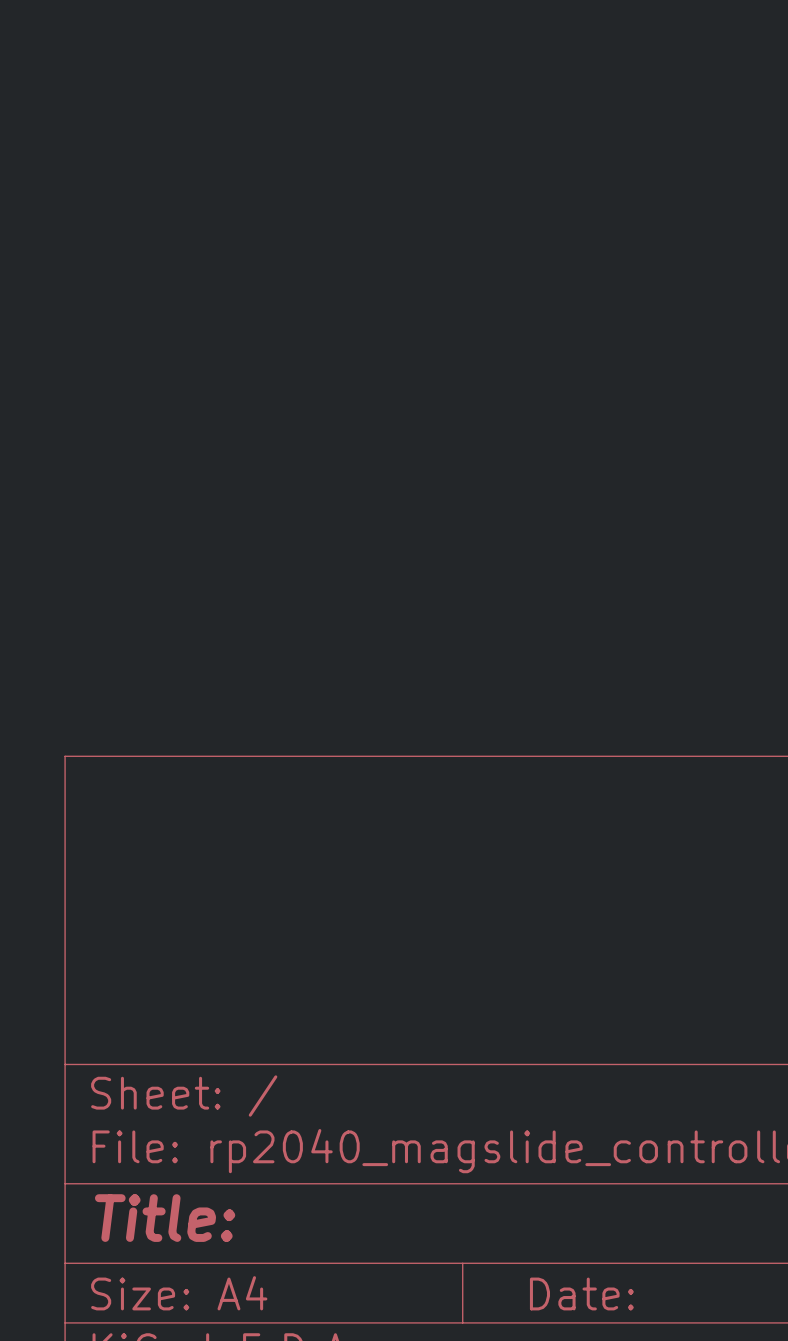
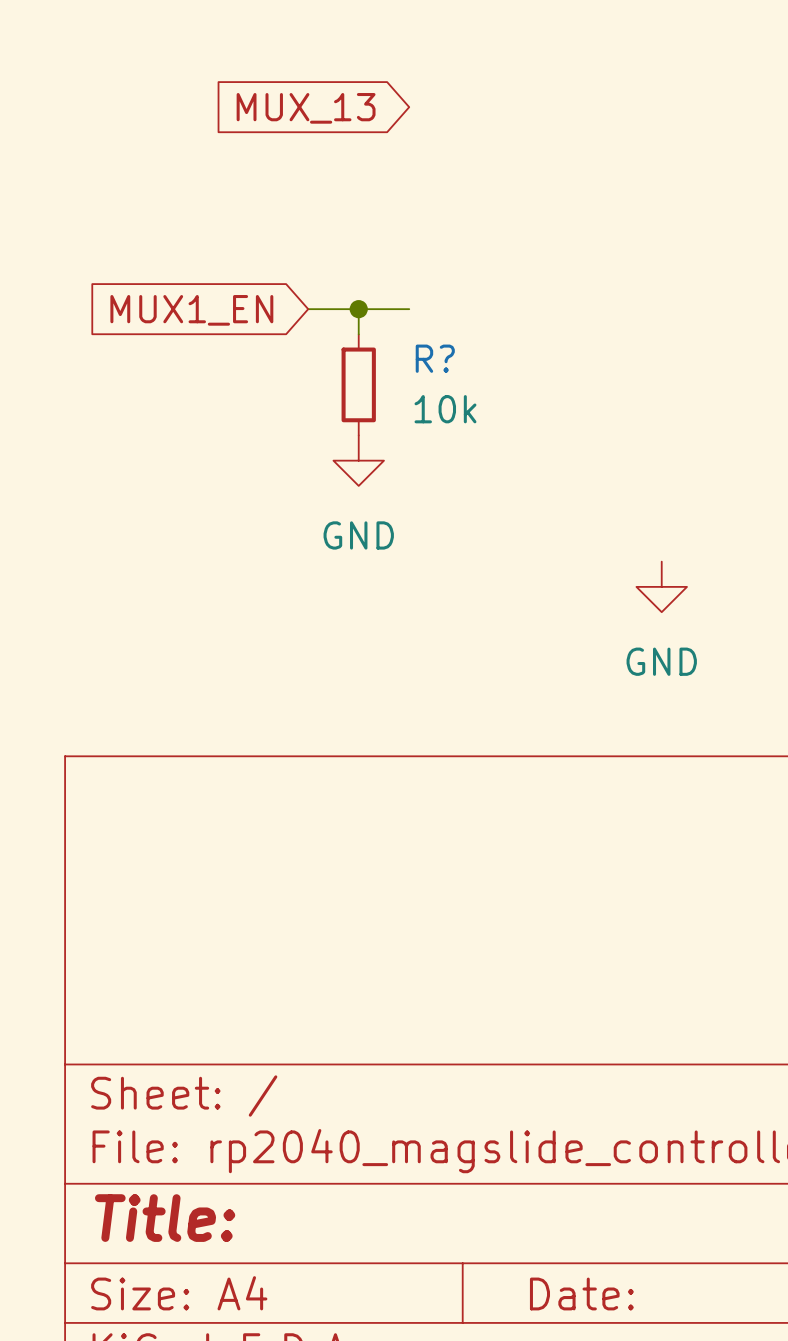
global label: none -> MUX_13 (306, 108)
wire: none -> (308, 309) (409, 309)
wire: none -> (358, 309) (358, 334)
junction: none -> (358, 309)
global label: none -> MUX1_EN (191, 310)
R?: none -> 10k (358, 384)
power symbol: none -> GND (358, 460)
power symbol: none -> GND (661, 586)

